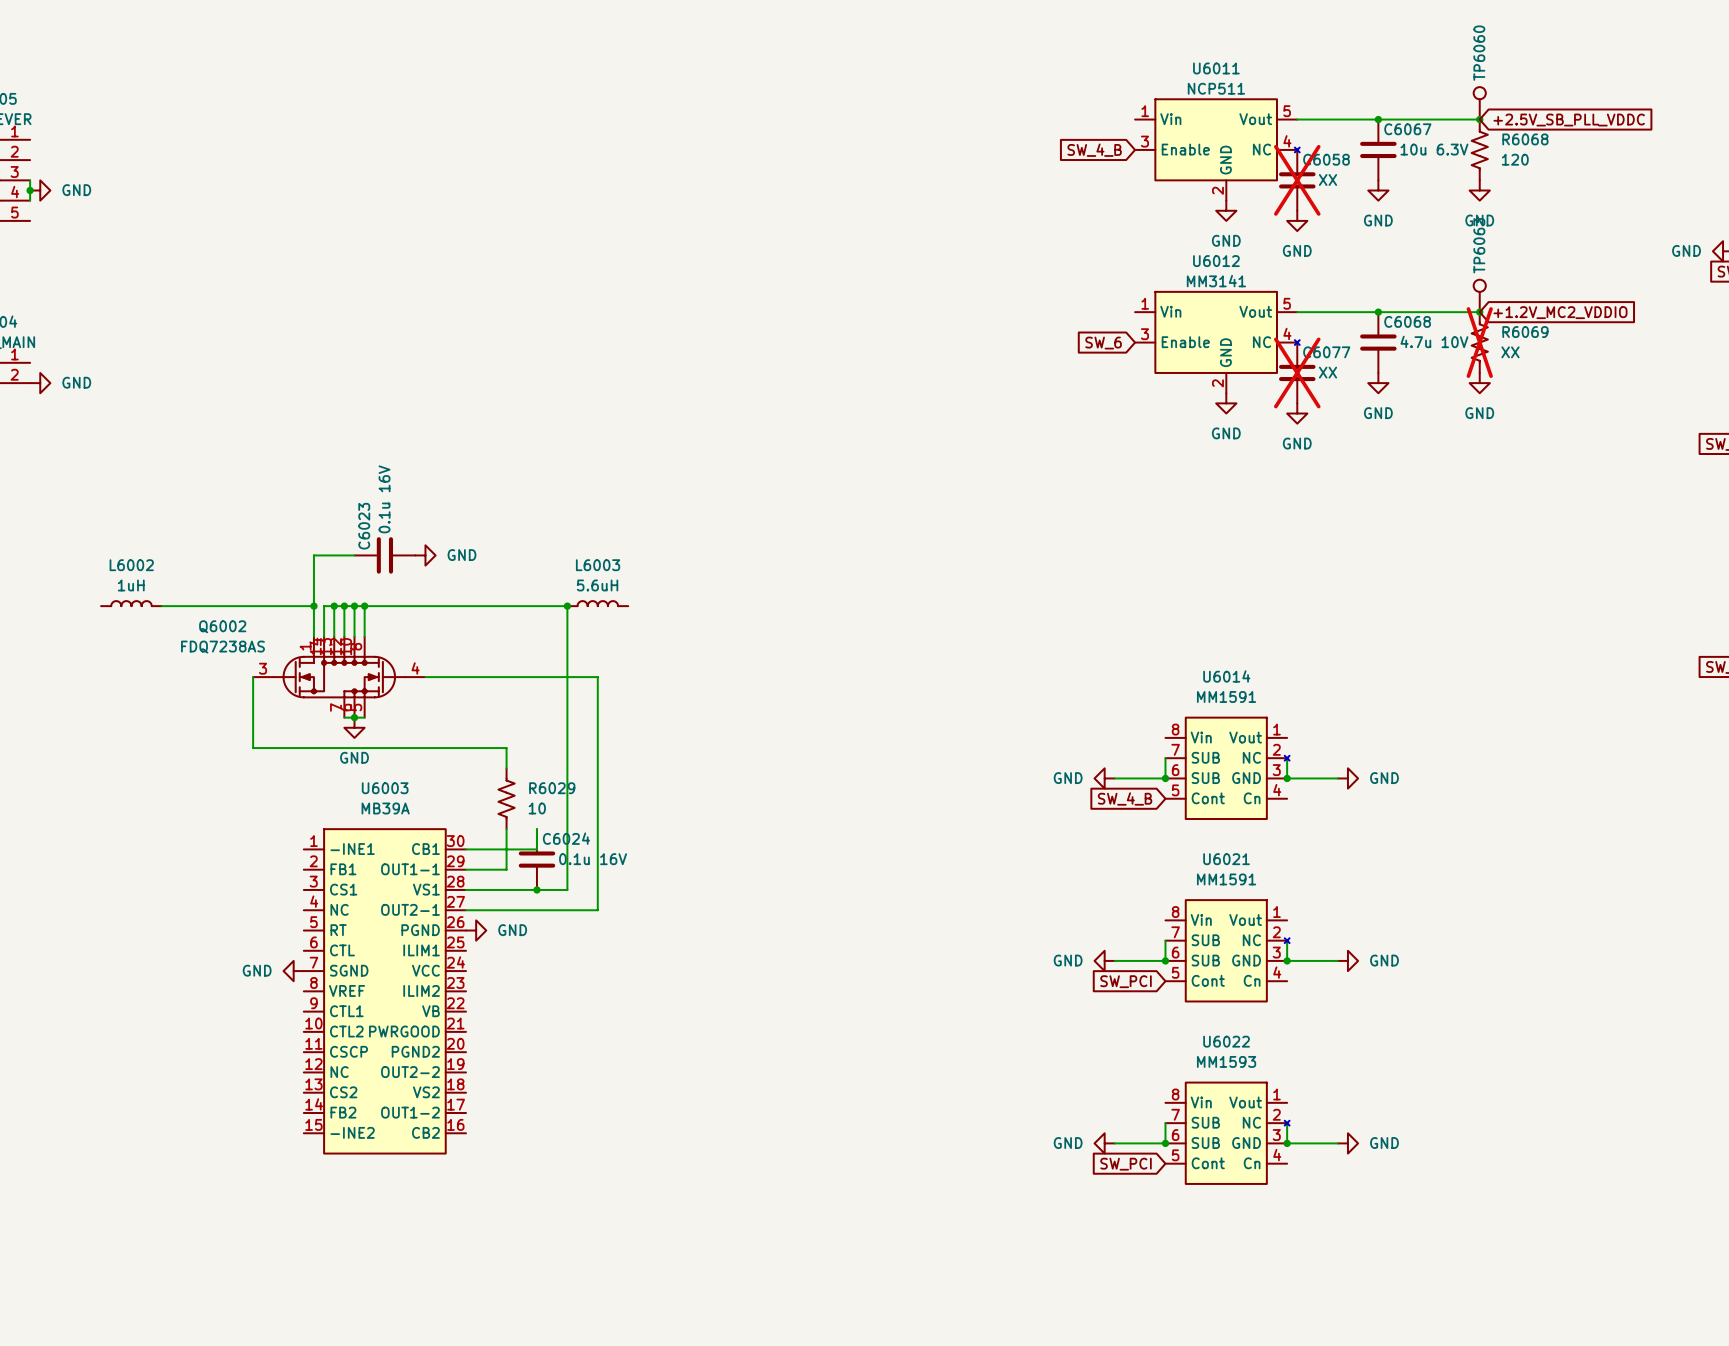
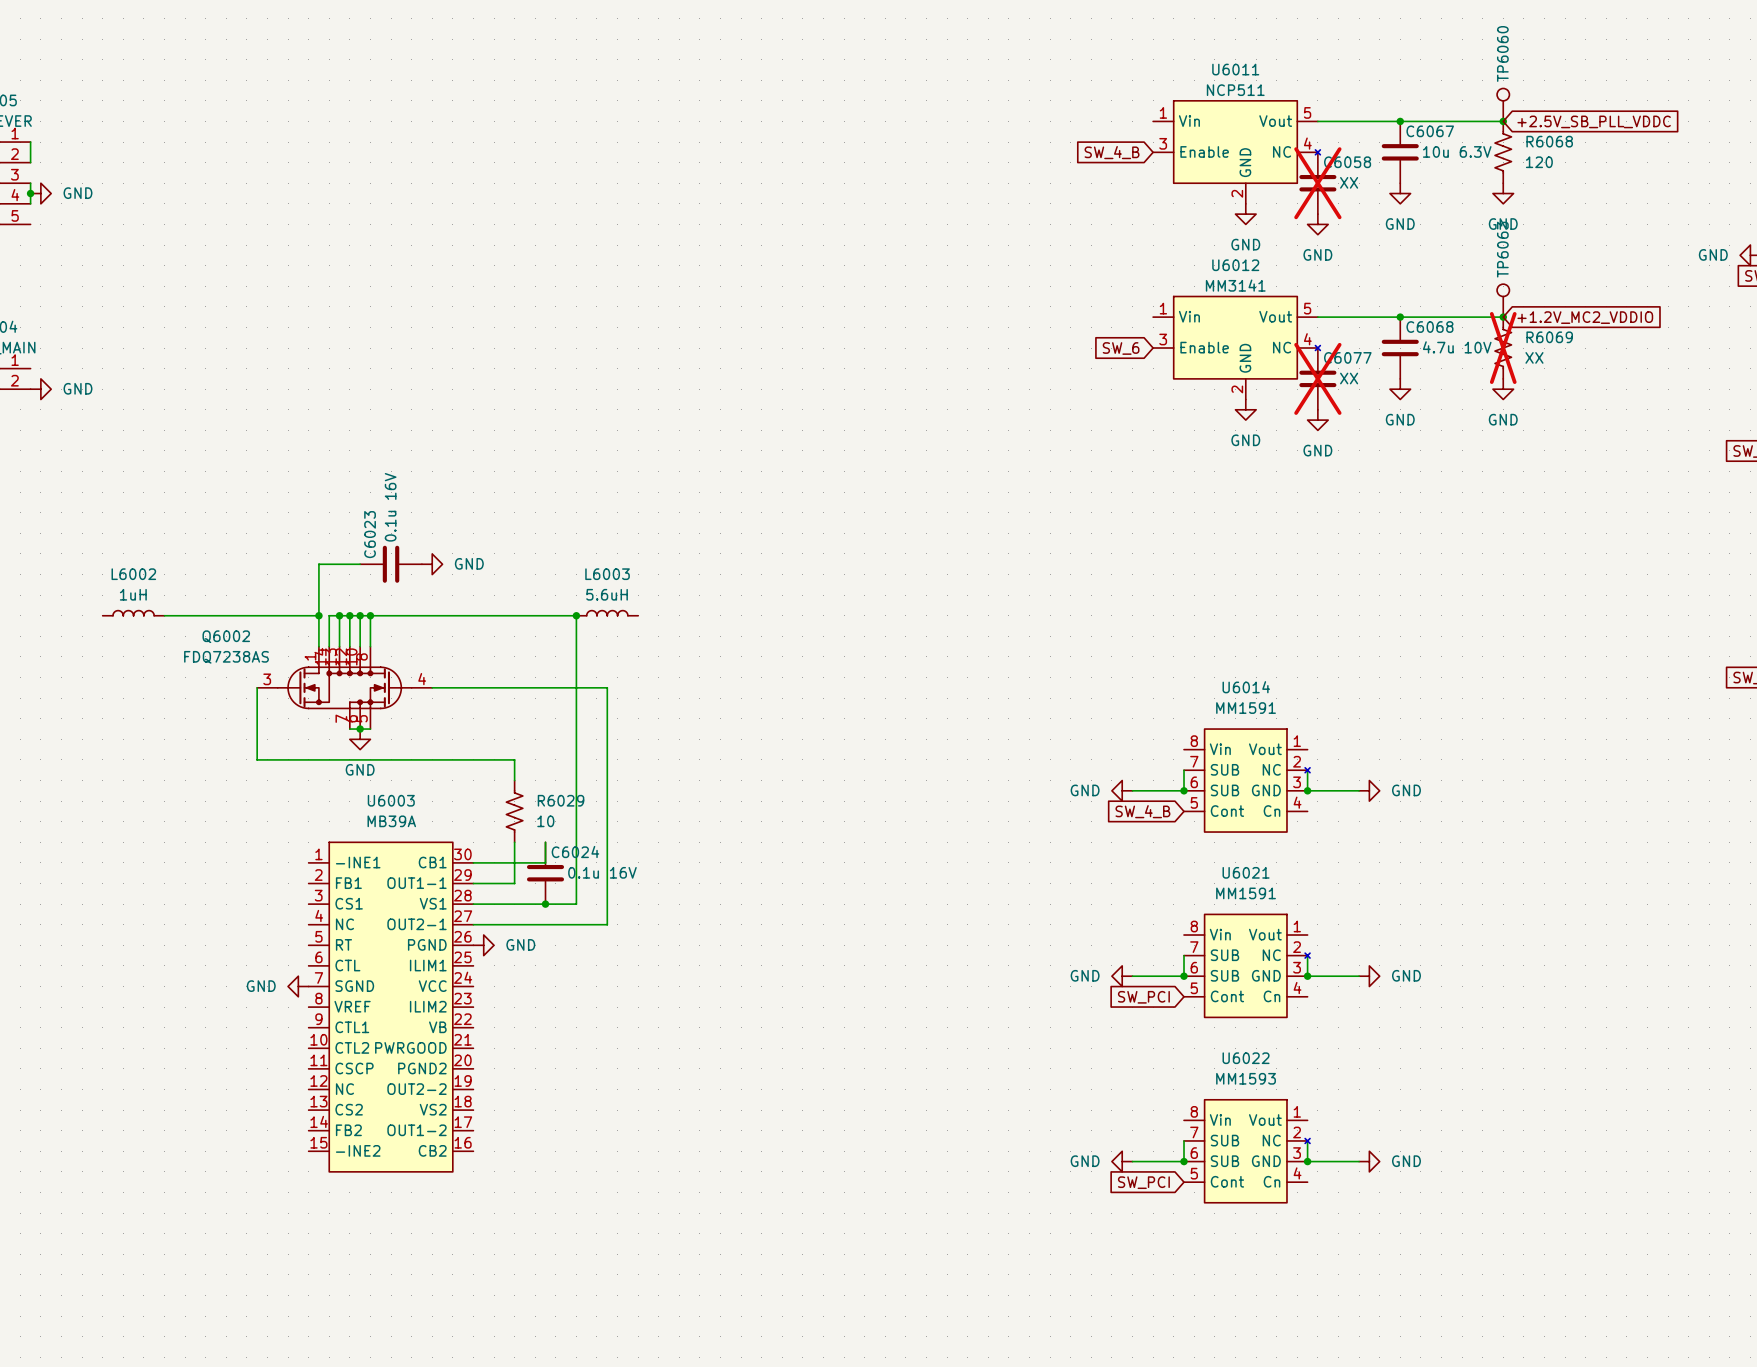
wire: none -> (30, 142) (30, 162)

